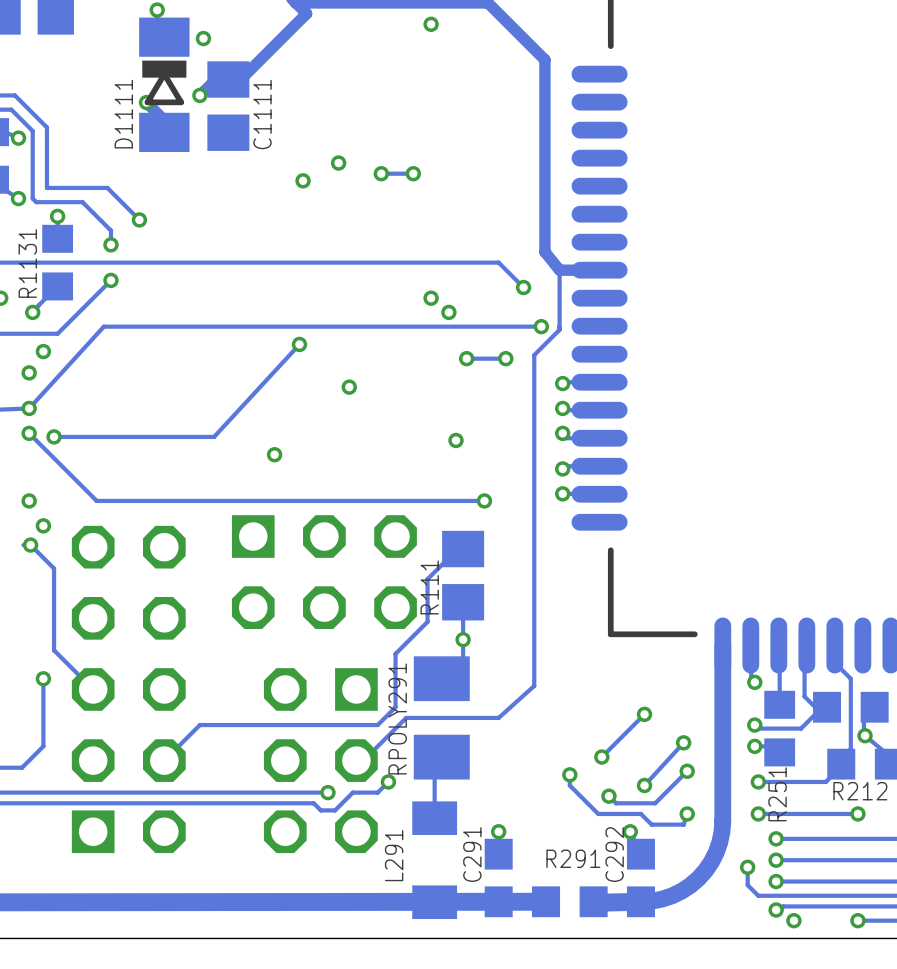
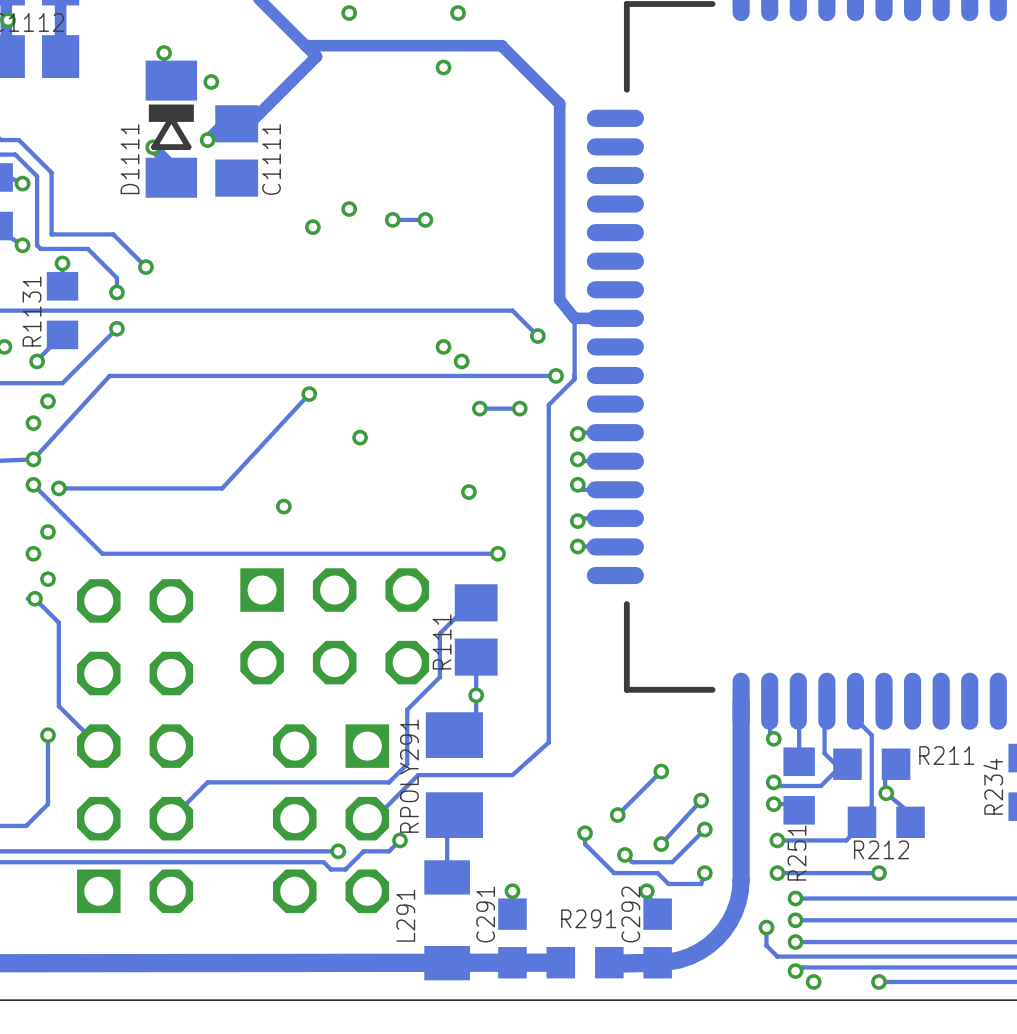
via: none -> (47, 531)

